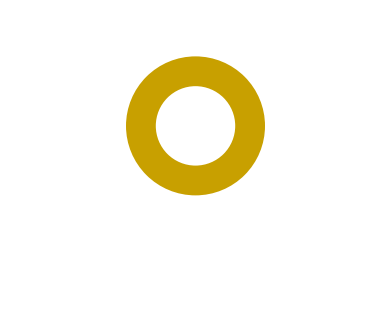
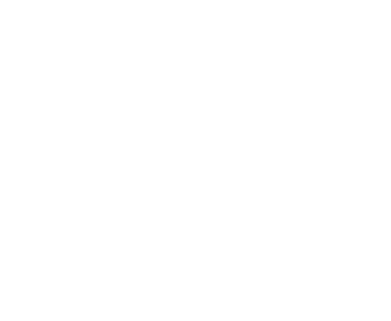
part: (195, 125) -> none

